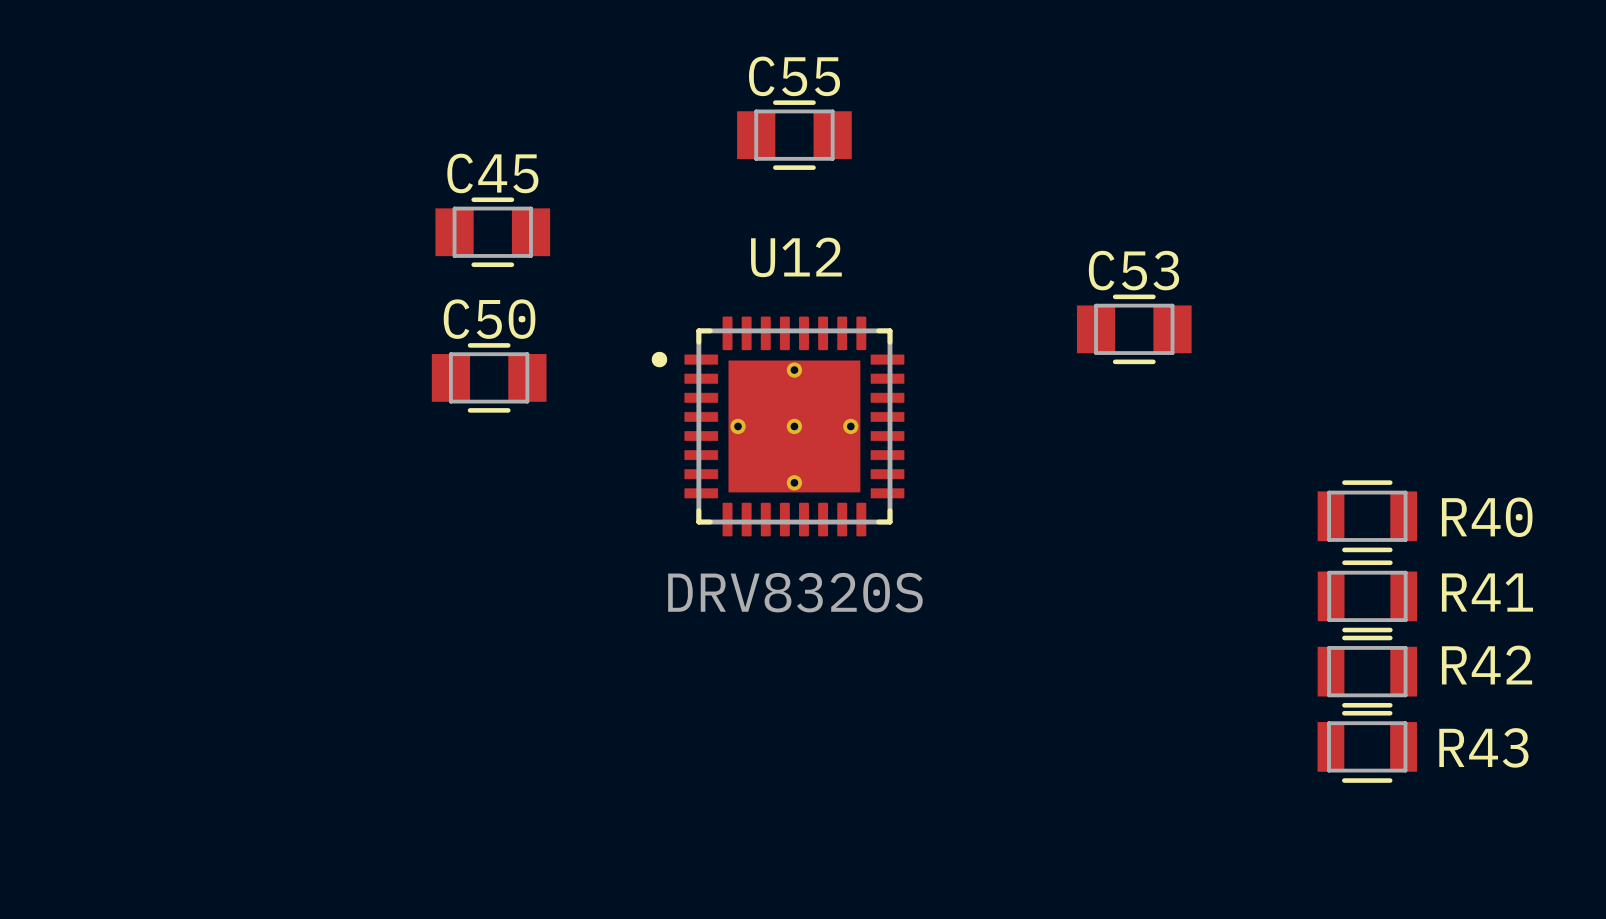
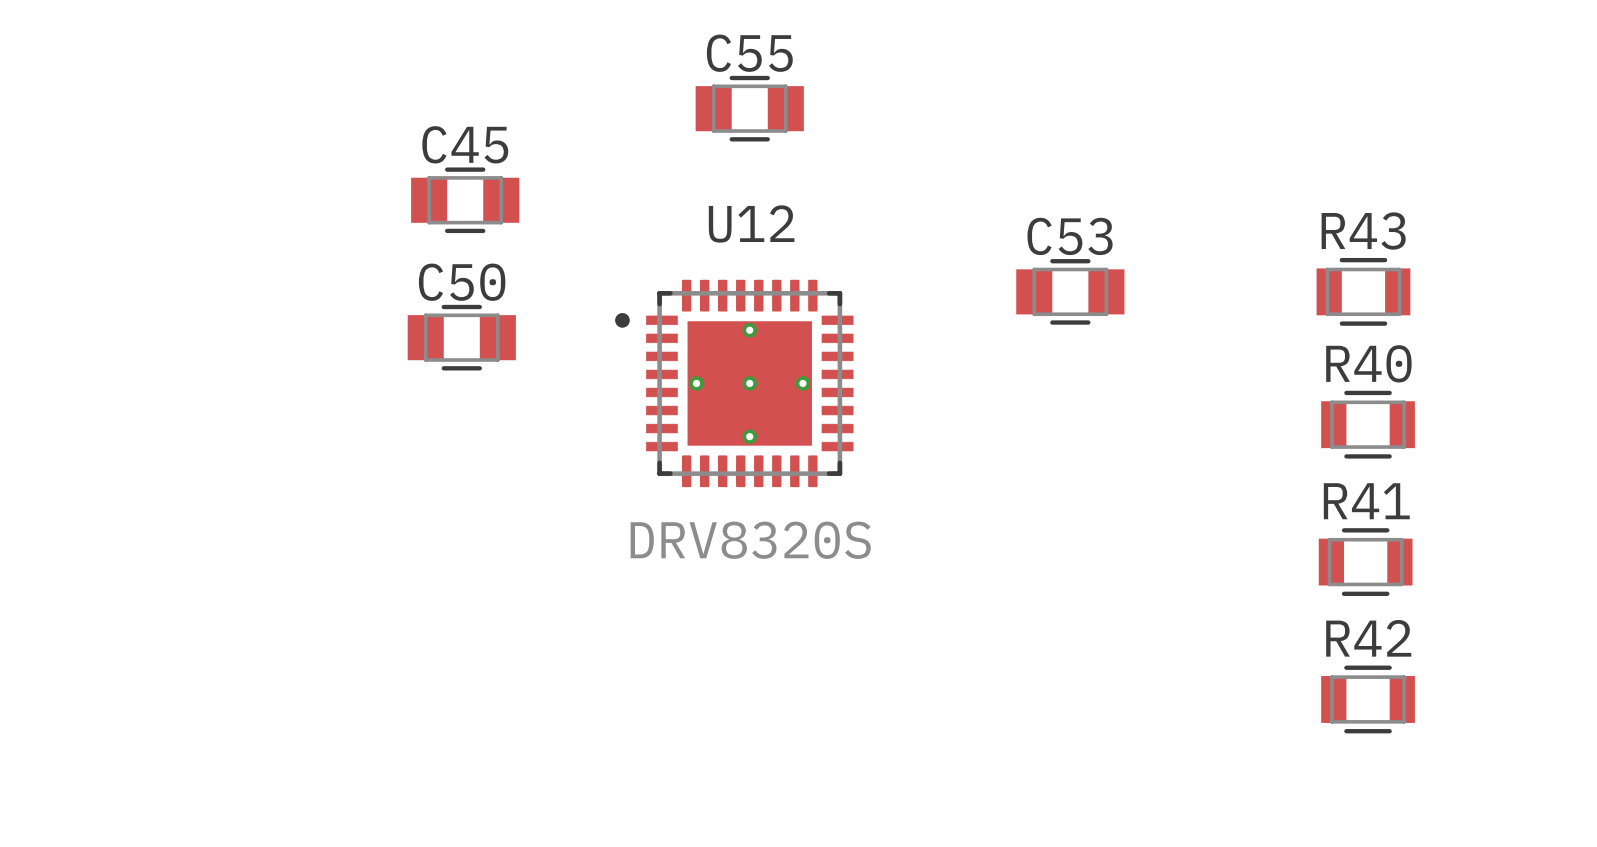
R40 position: (1367, 516) -> (1368, 424)
R40 name position: R40 (1487, 517) -> R40 (1368, 363)
R41 name position: R41 (1487, 592) -> R41 (1366, 501)
R41 position: (1367, 596) -> (1365, 562)
R42 name position: R42 (1487, 665) -> R42 (1368, 638)
R42 position: (1367, 671) -> (1368, 699)
R43 position: (1367, 746) -> (1363, 291)
R43 name position: R43 (1483, 747) -> R43 (1363, 231)

